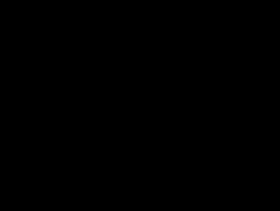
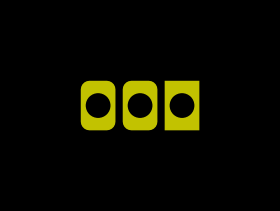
part: none -> (140, 105)

